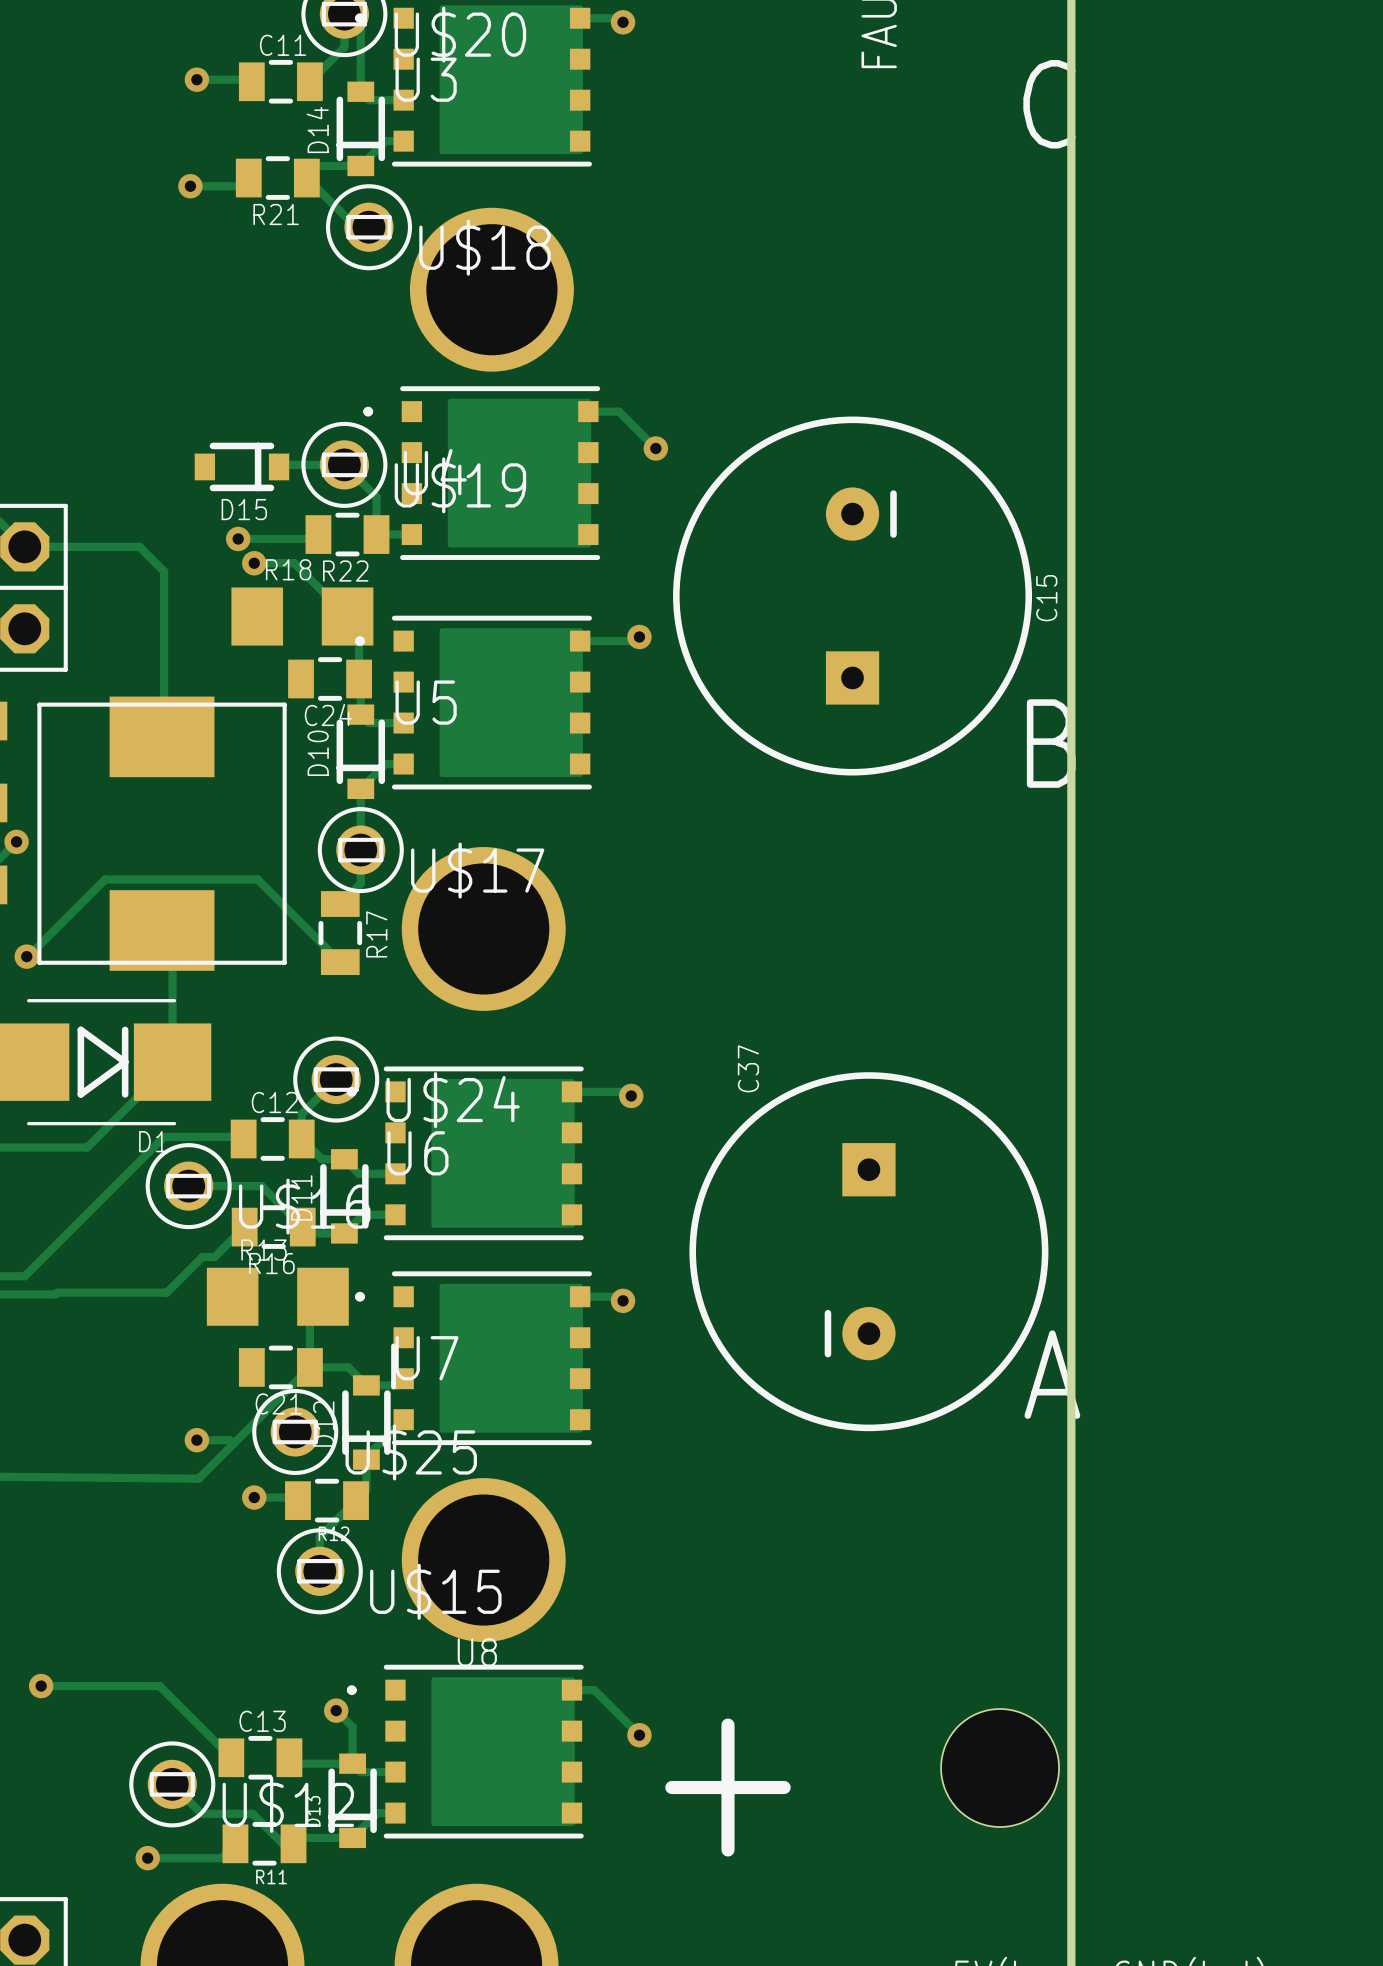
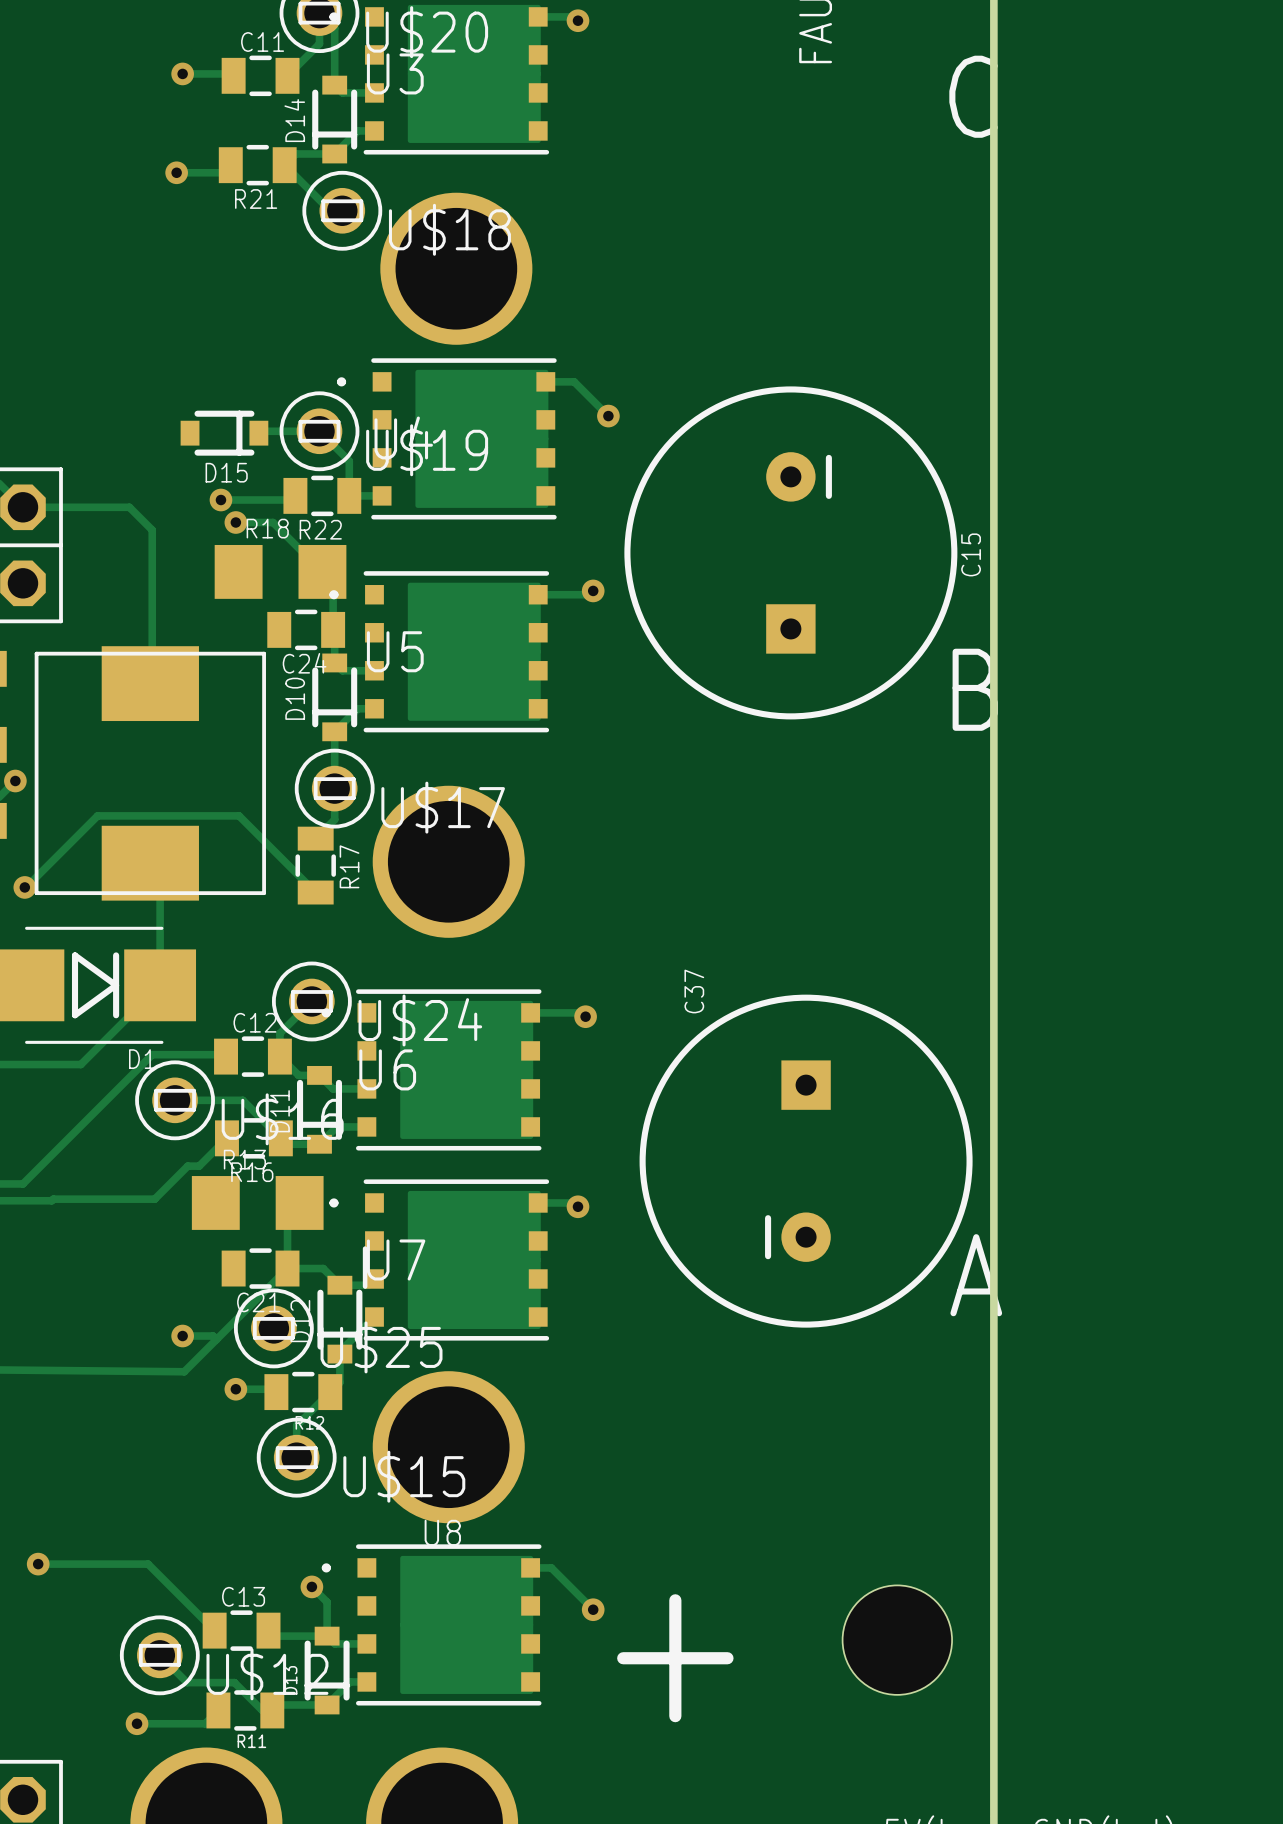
hole position: (1000, 1768) -> (897, 1640)

